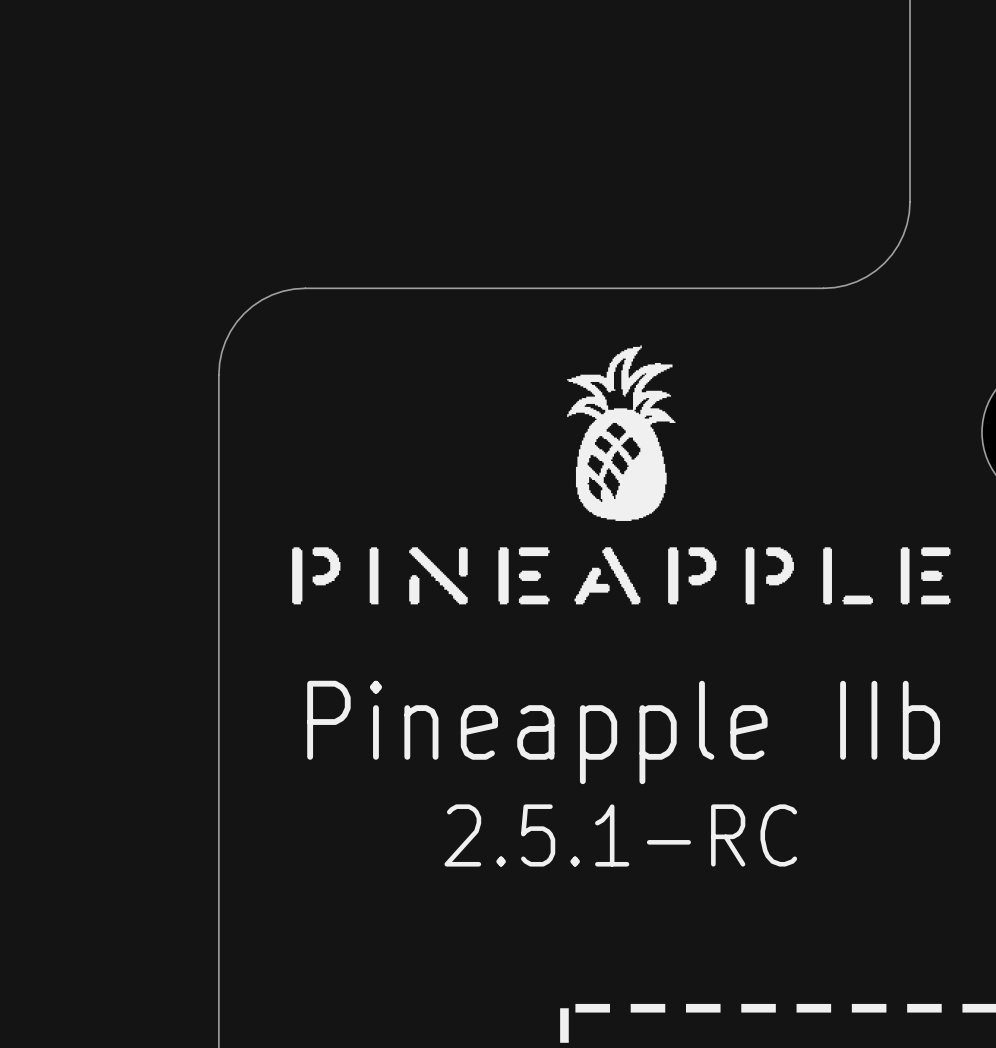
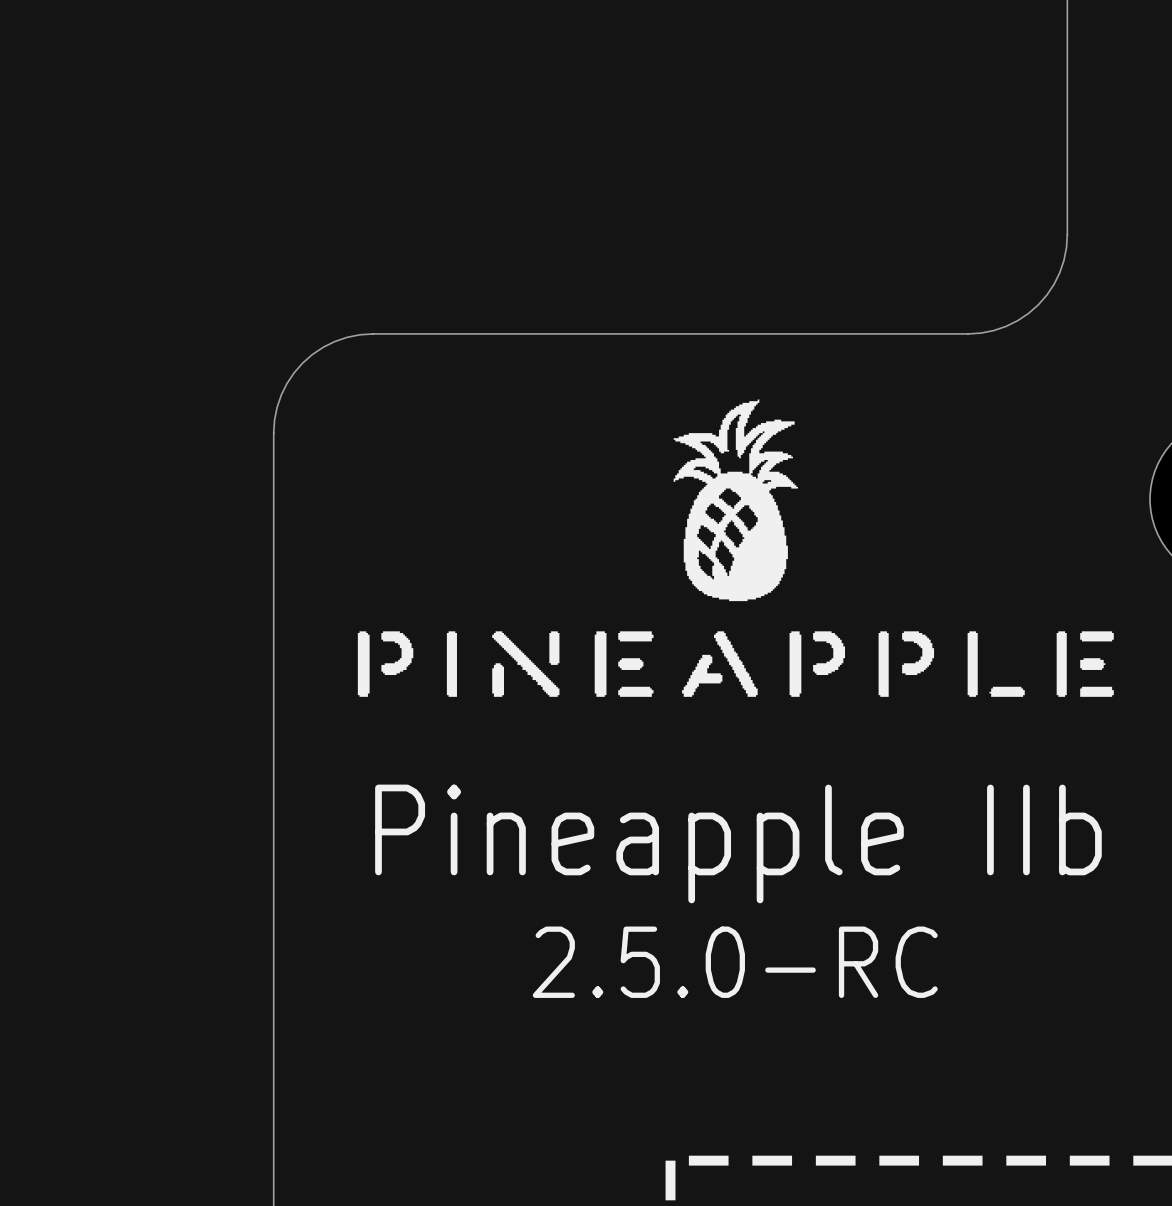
text: 2.5.1-RC (620, 835) -> 2.5.0-RC (735, 962)

